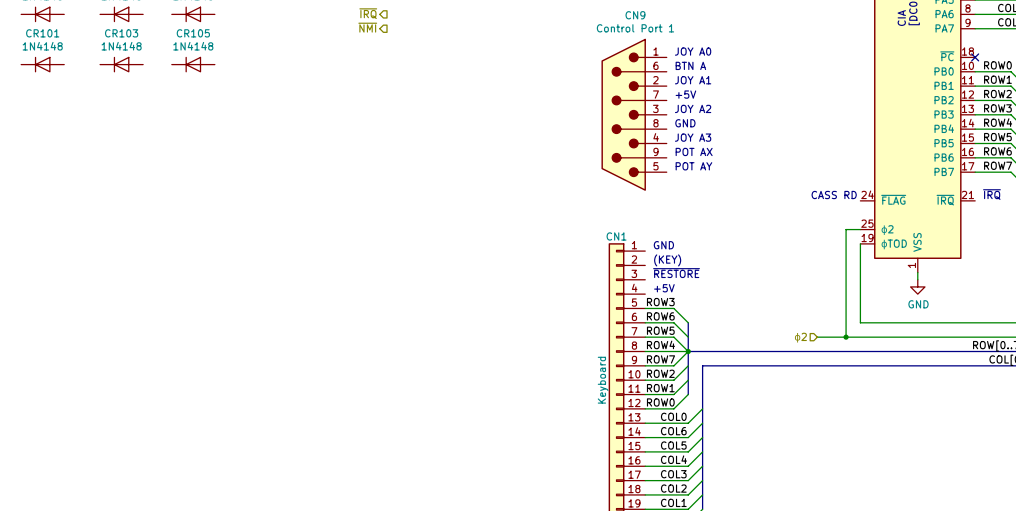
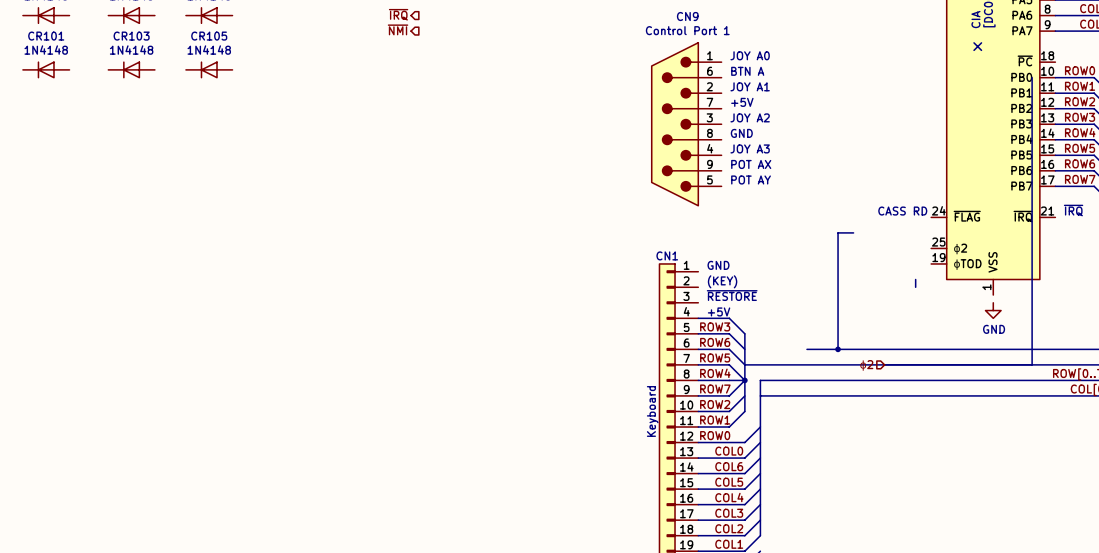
no-connect mark: none -> (977, 46)
no-connect mark: (975, 57) -> none
bus: none -> (1032, 77) (1032, 364) (744, 364)
wire: none -> (853, 232) (838, 232) (838, 349)
wire: (860, 229) (846, 229) (846, 258) -> none
wire: (860, 243) (860, 322) -> (806, 349) (931, 349)
wire: (846, 265) (846, 337) -> none
wire: (917, 272) (917, 279) -> none
wire: none -> (698, 318) (729, 318) (744, 333)
junction: none -> (838, 349)
junction: (846, 337) -> none
bus: (688, 351) (702, 351) -> (760, 395) (760, 380)
bus: (688, 380) (688, 394) -> (744, 333) (744, 349)
wire: (688, 394) (673, 408) -> (760, 427) (744, 442) (729, 442)
bus: (702, 494) (702, 509) -> none

